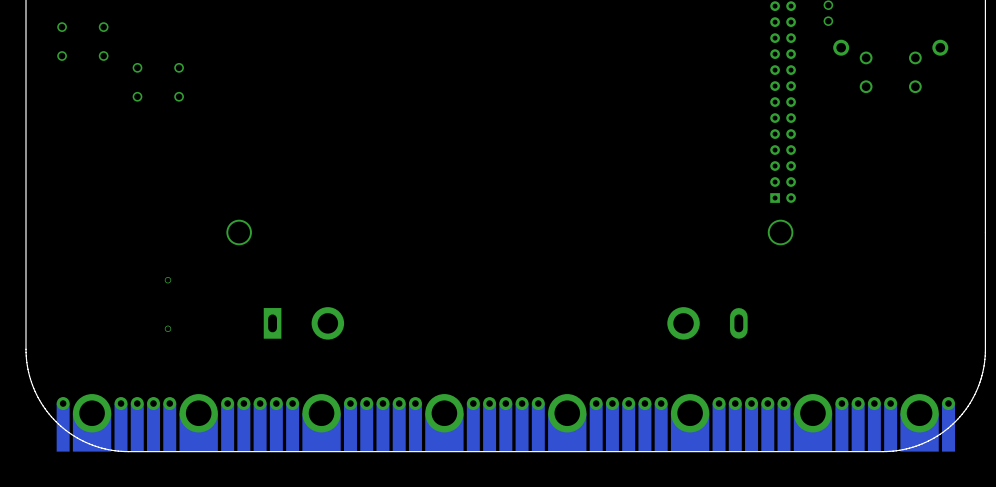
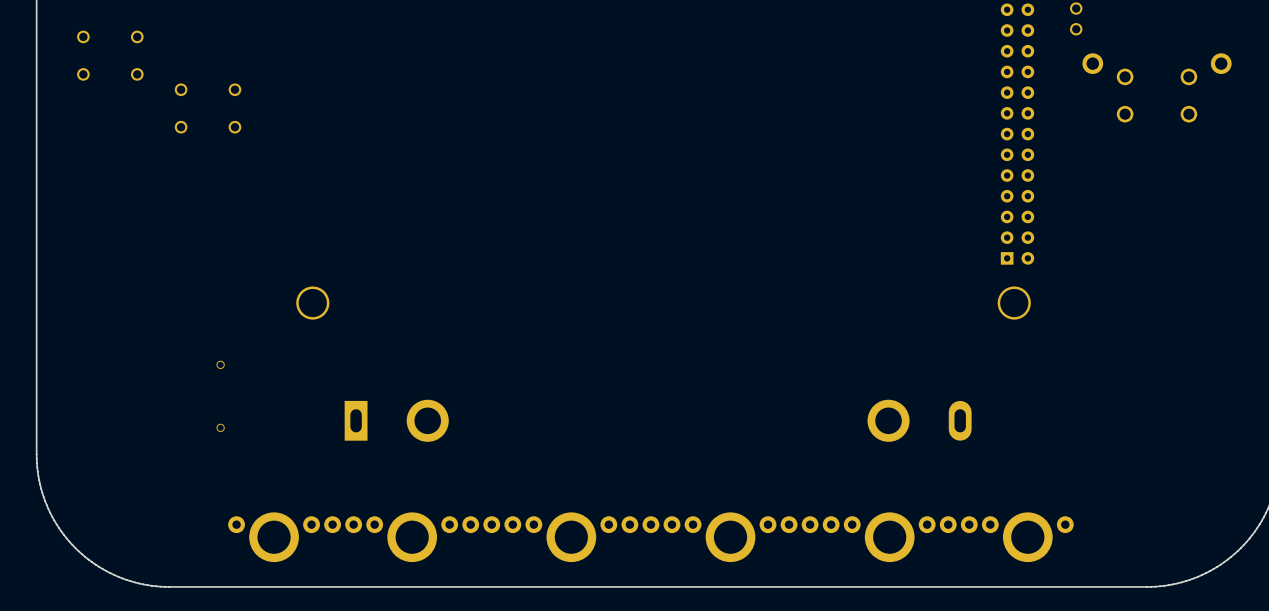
part: none -> (650, 537)
part: (505, 422) -> none

